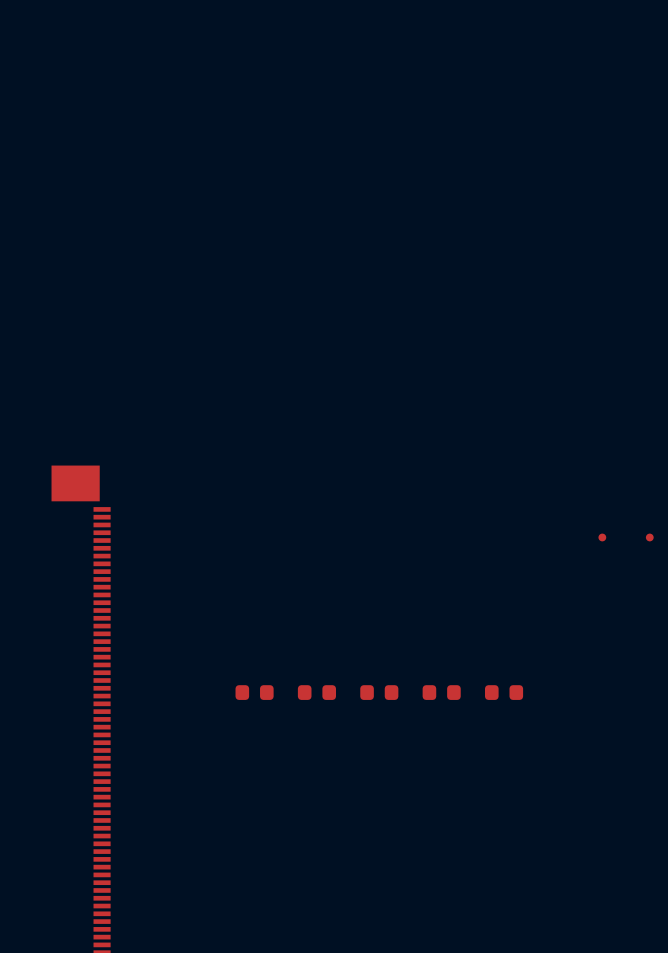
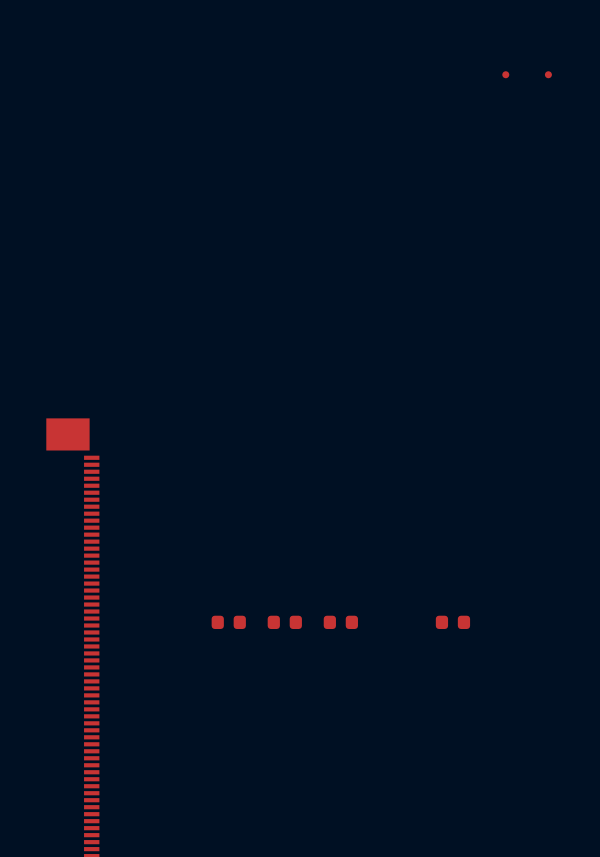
part: none -> (505, 74)
part: none -> (548, 74)
part: (602, 537) -> none
part: (649, 537) -> none
part: (441, 692) -> none

